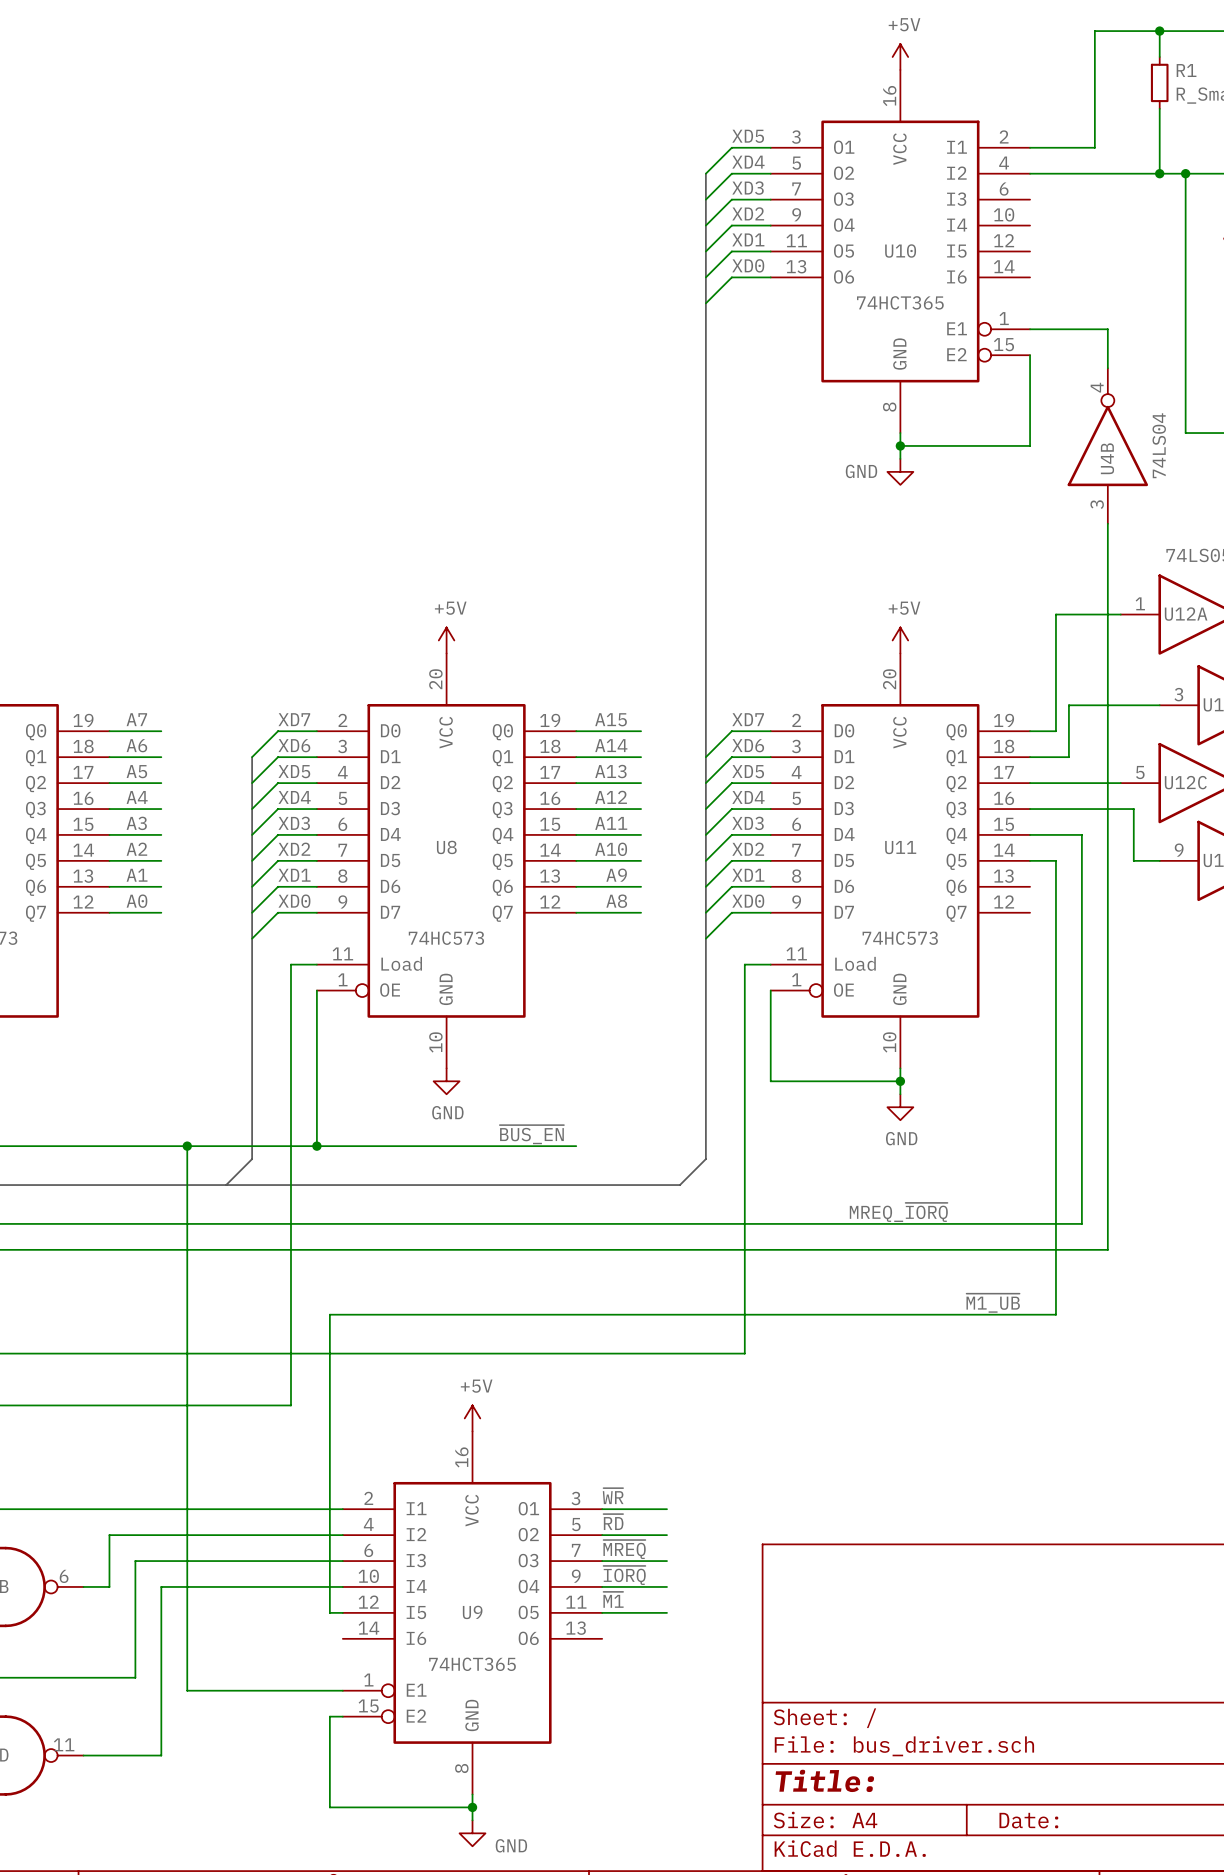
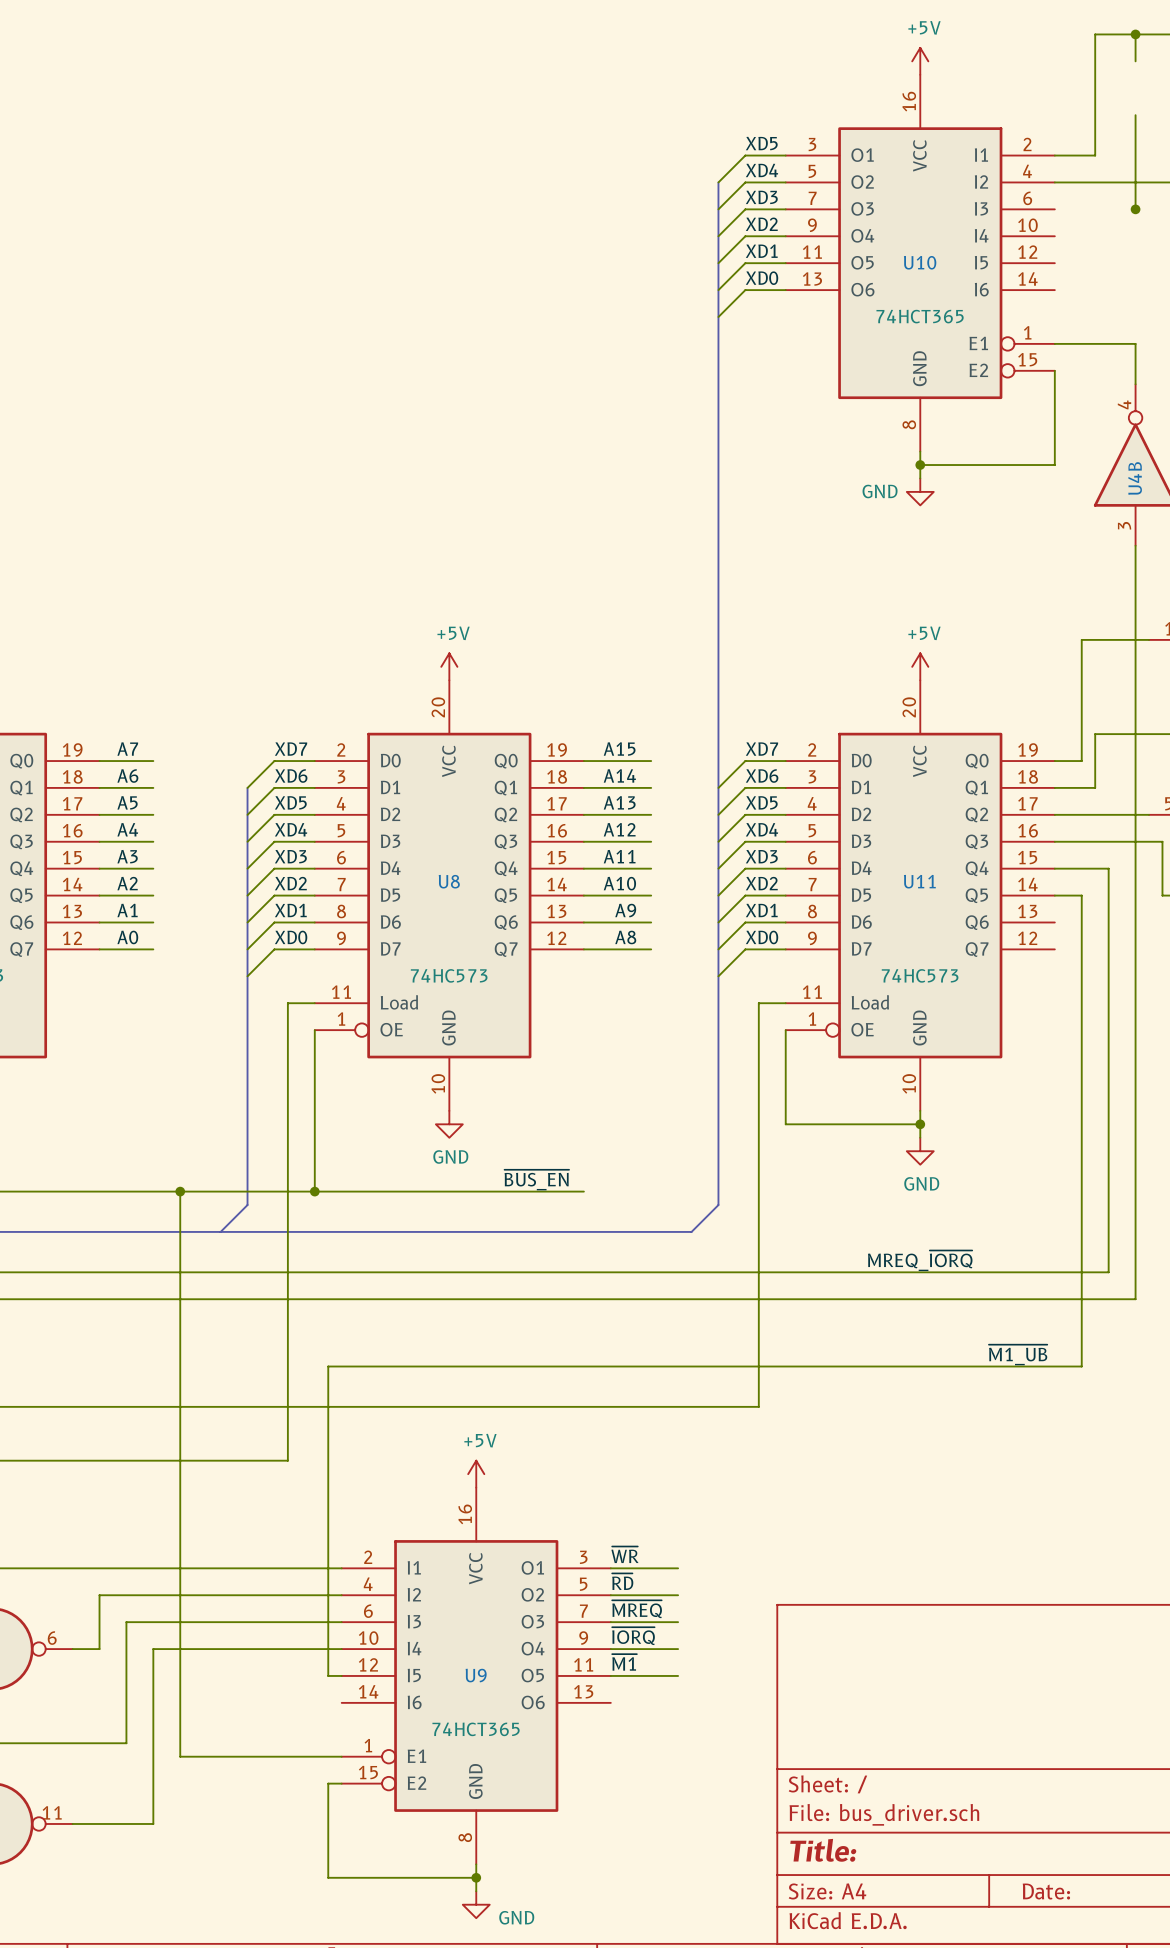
wire: (1094, 31) (1094, 147) (1068, 147) -> (1122, 34) (1095, 34) (1095, 155)
wire: none -> (1135, 34) (1135, 61)
junction: none -> (1135, 34)
wire: none -> (1135, 115) (1135, 209)
junction: none -> (1135, 209)

